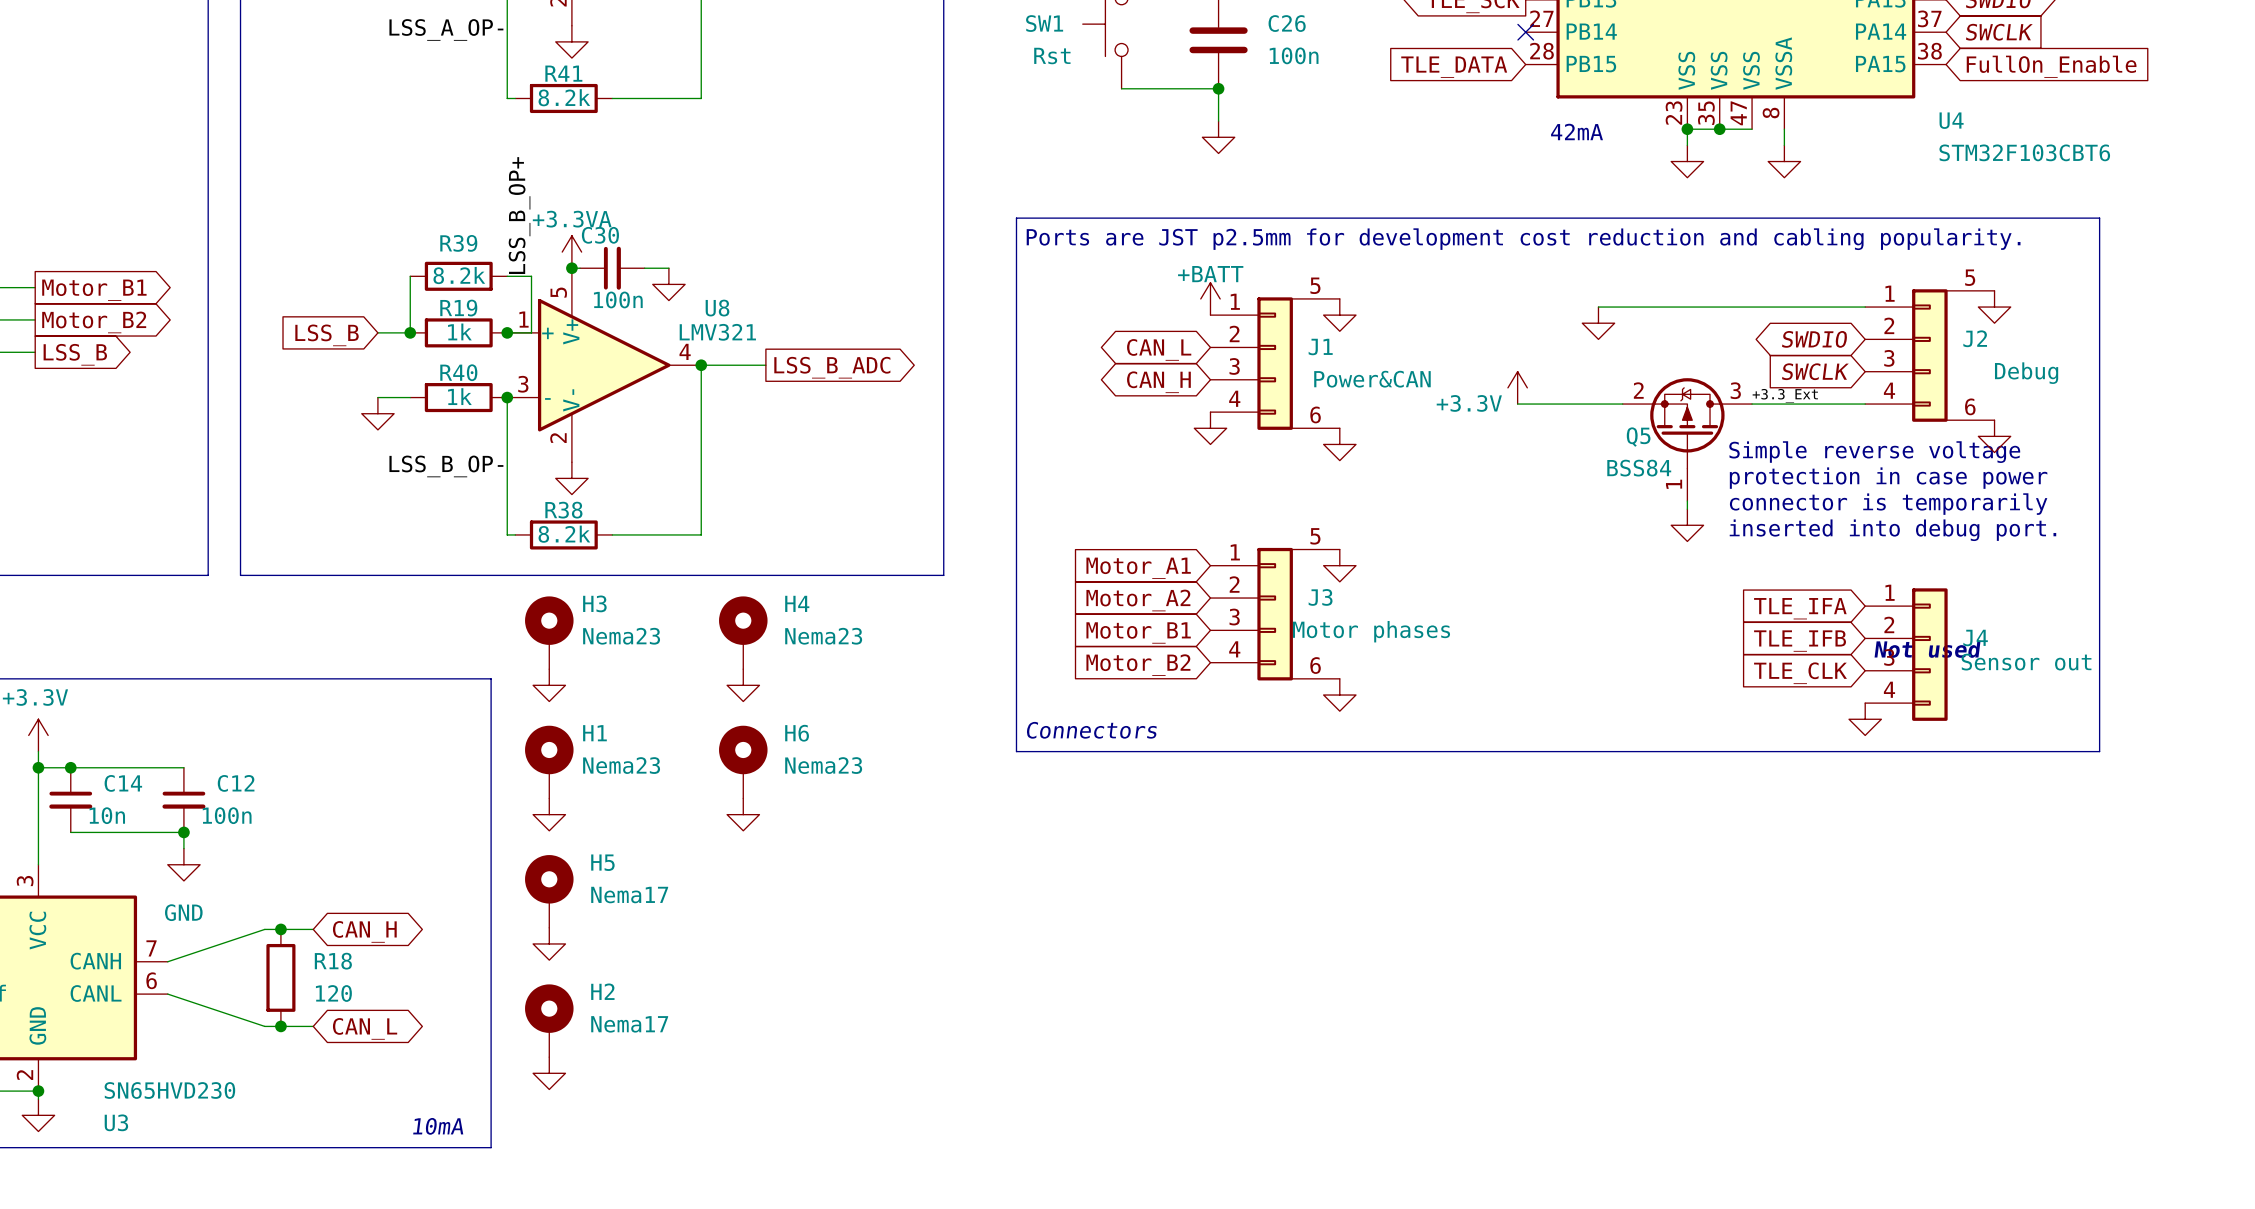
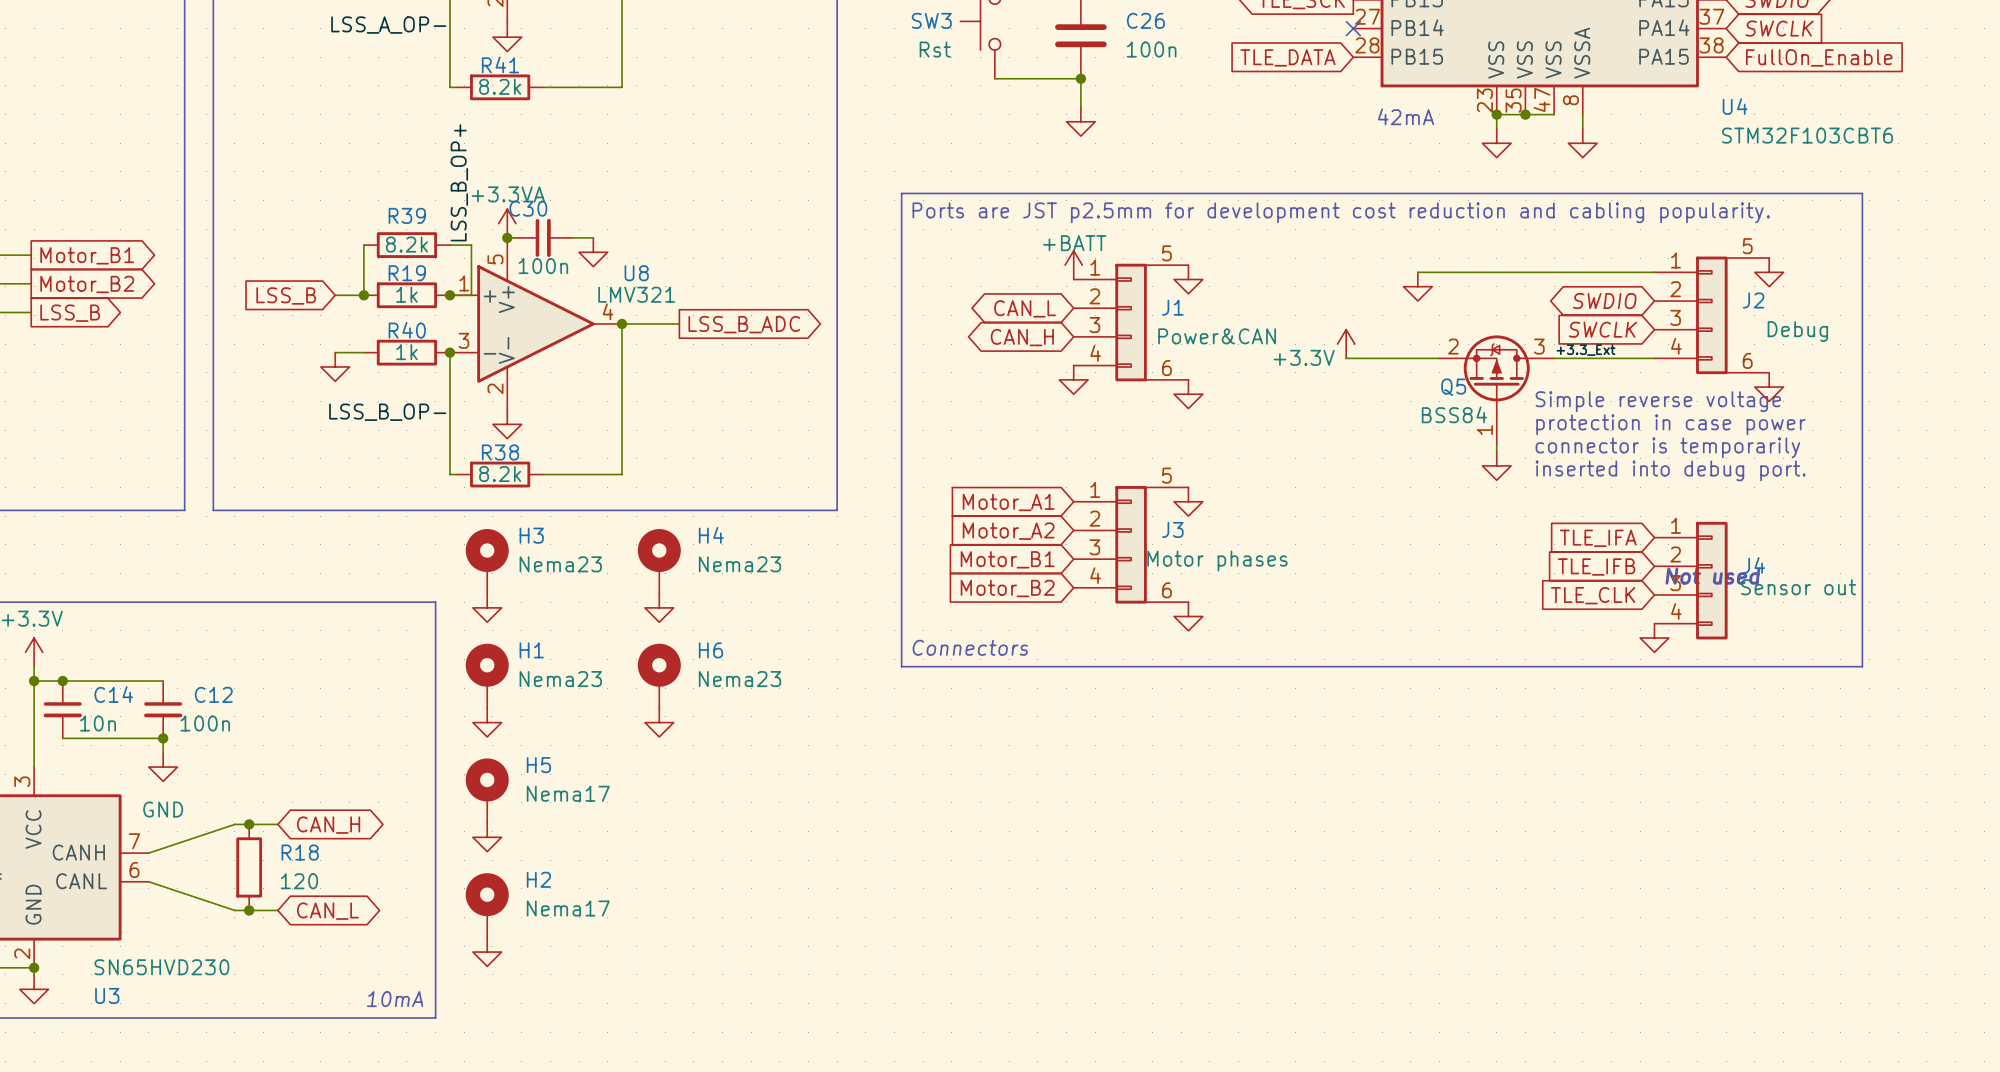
SW1 name: SW1 (1044, 23) -> SW3 (931, 20)

